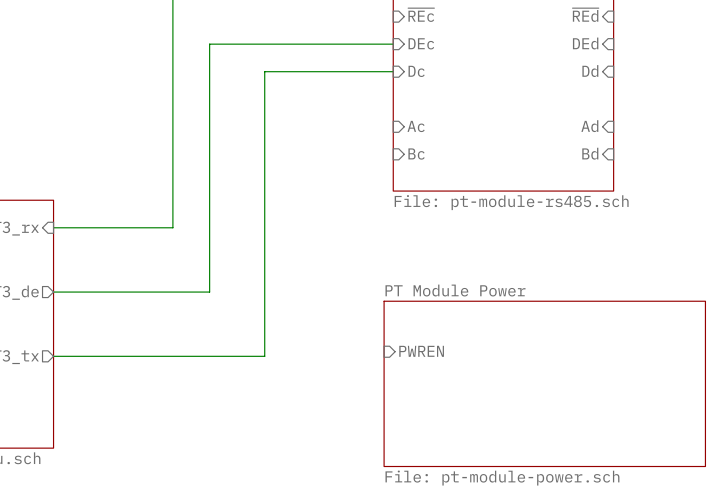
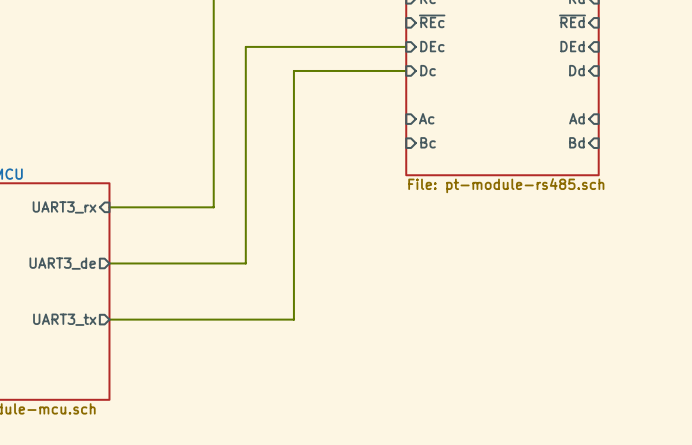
sheet pin: PWREN (421, 351) -> none
sheet PT Module Power: File: pt-module-power.sch (544, 383) -> none

